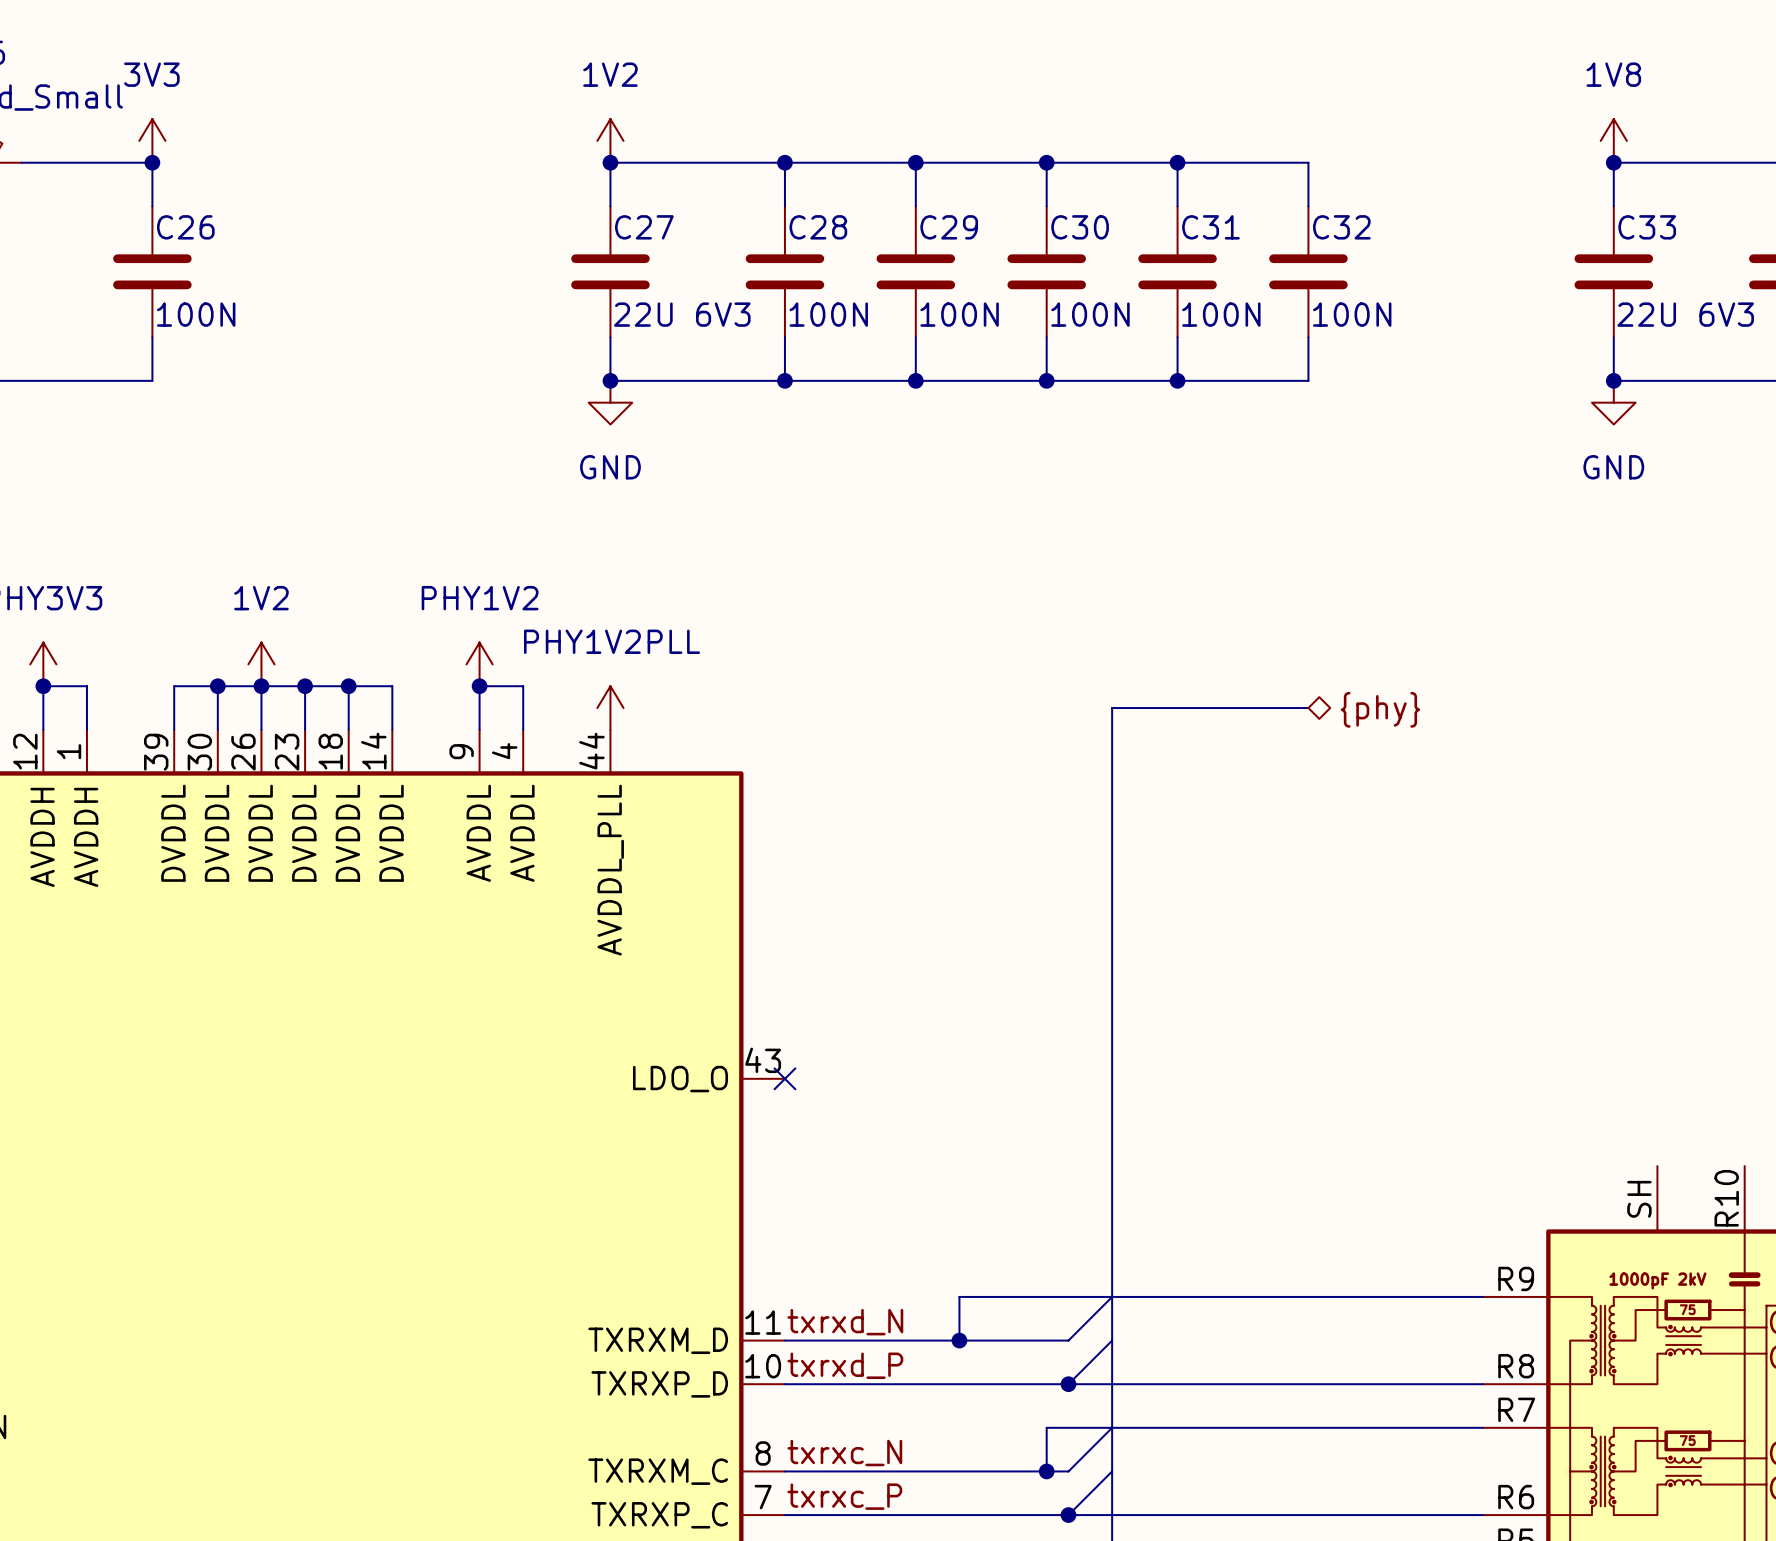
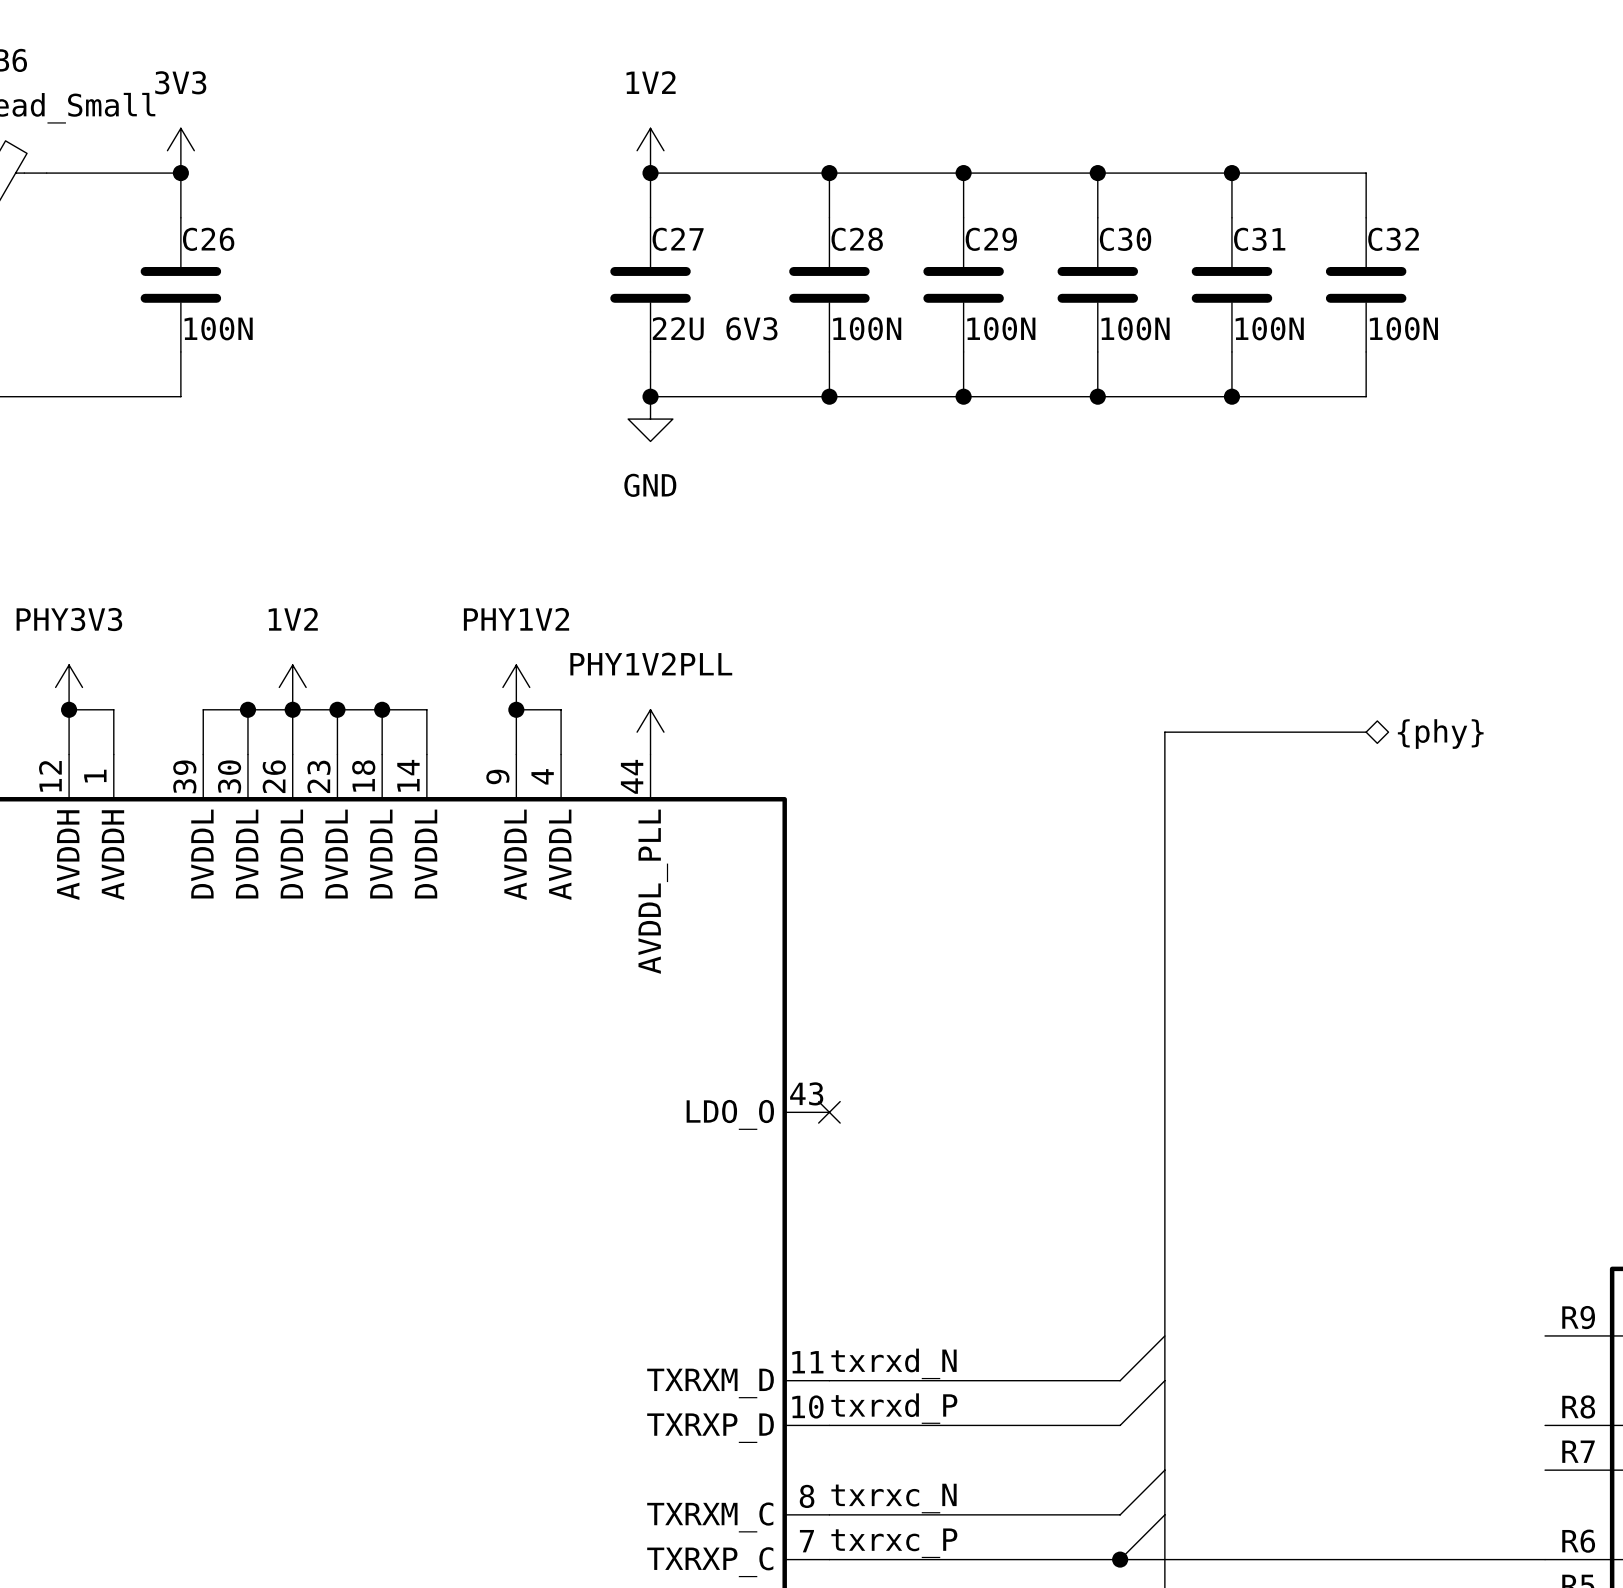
wire: (1482, 1296) (959, 1296) (959, 1340) -> none
junction: (959, 1340) -> none
wire: (1068, 1384) (1482, 1384) -> none
junction: (1068, 1384) -> none
wire: (1482, 1427) (1046, 1427) (1046, 1471) -> none
junction: (1046, 1471) -> none

